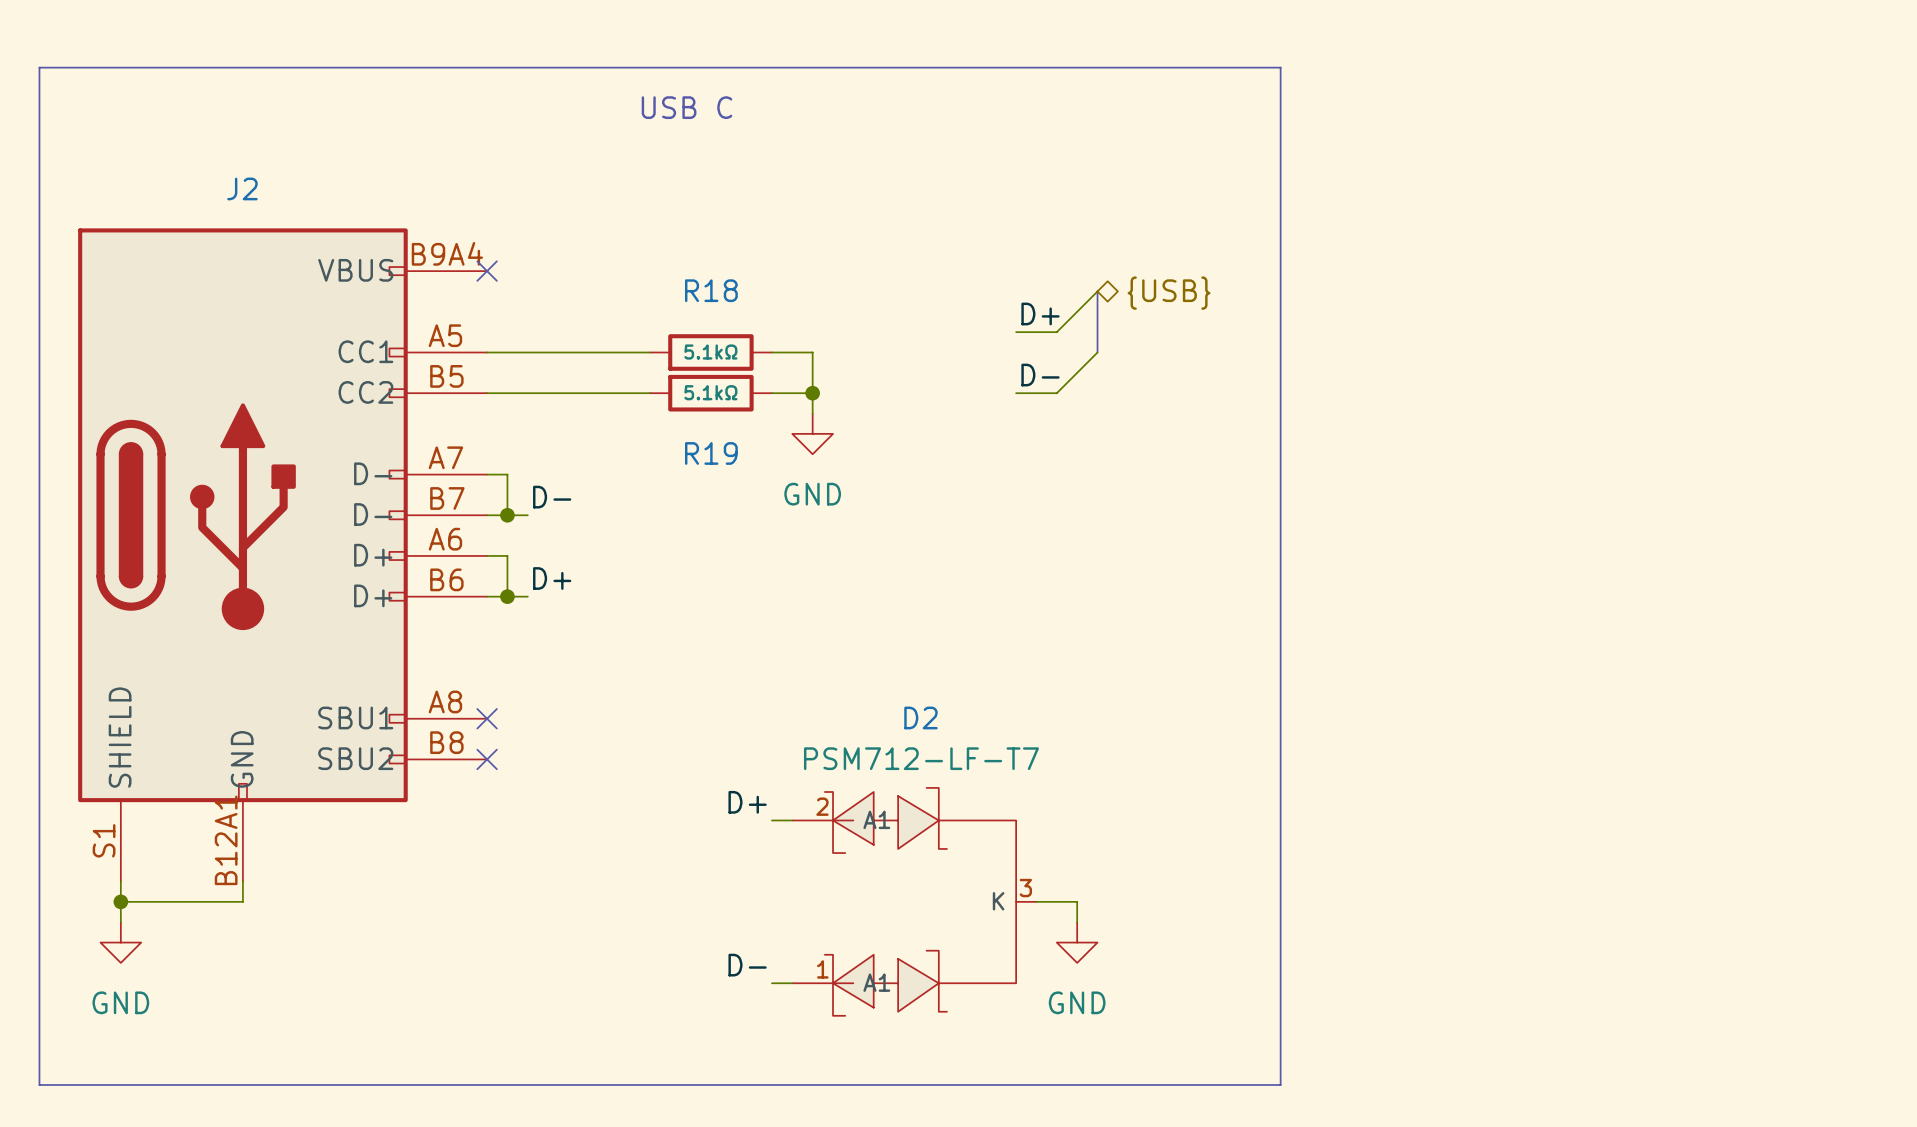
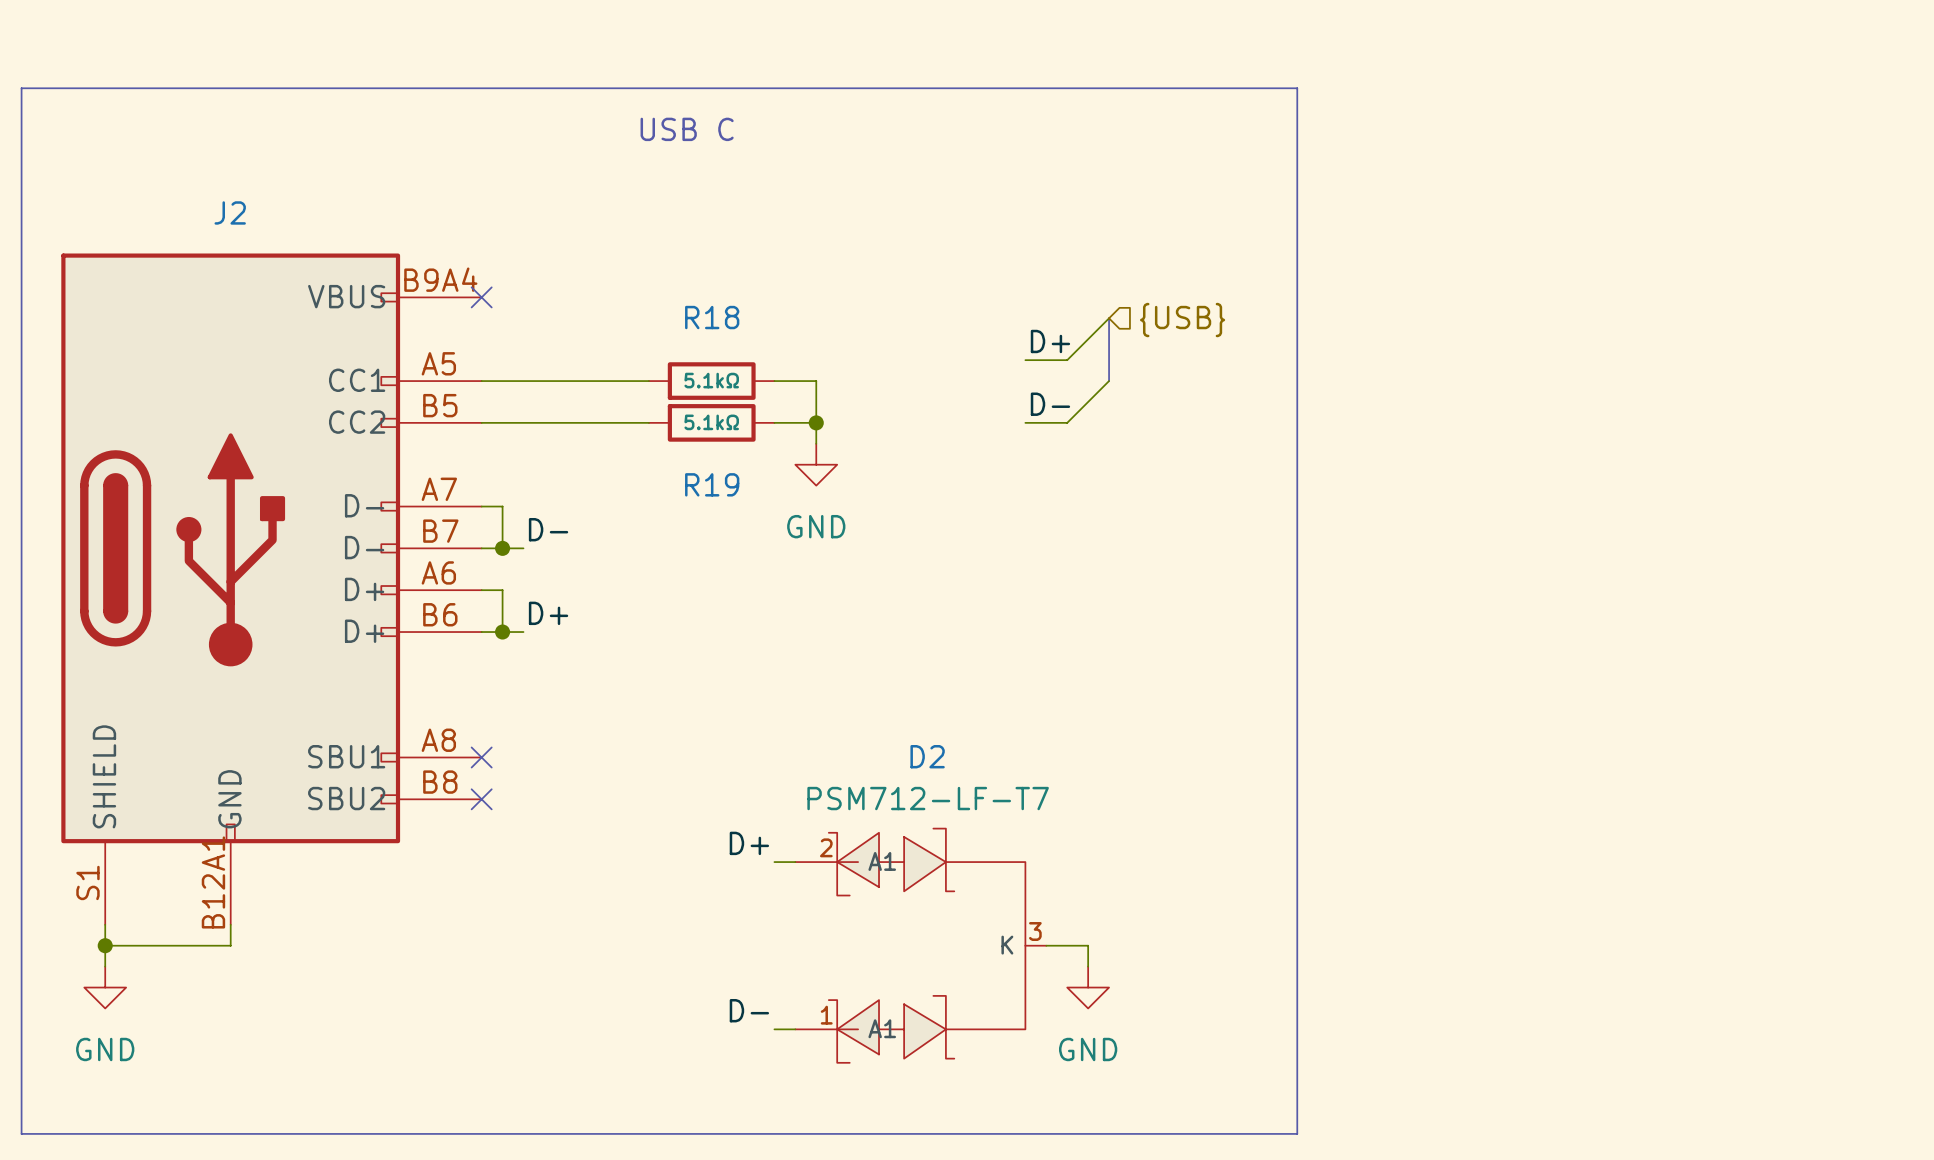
hierarchical label shape: bidirectional (1169, 293) -> input (1182, 320)

